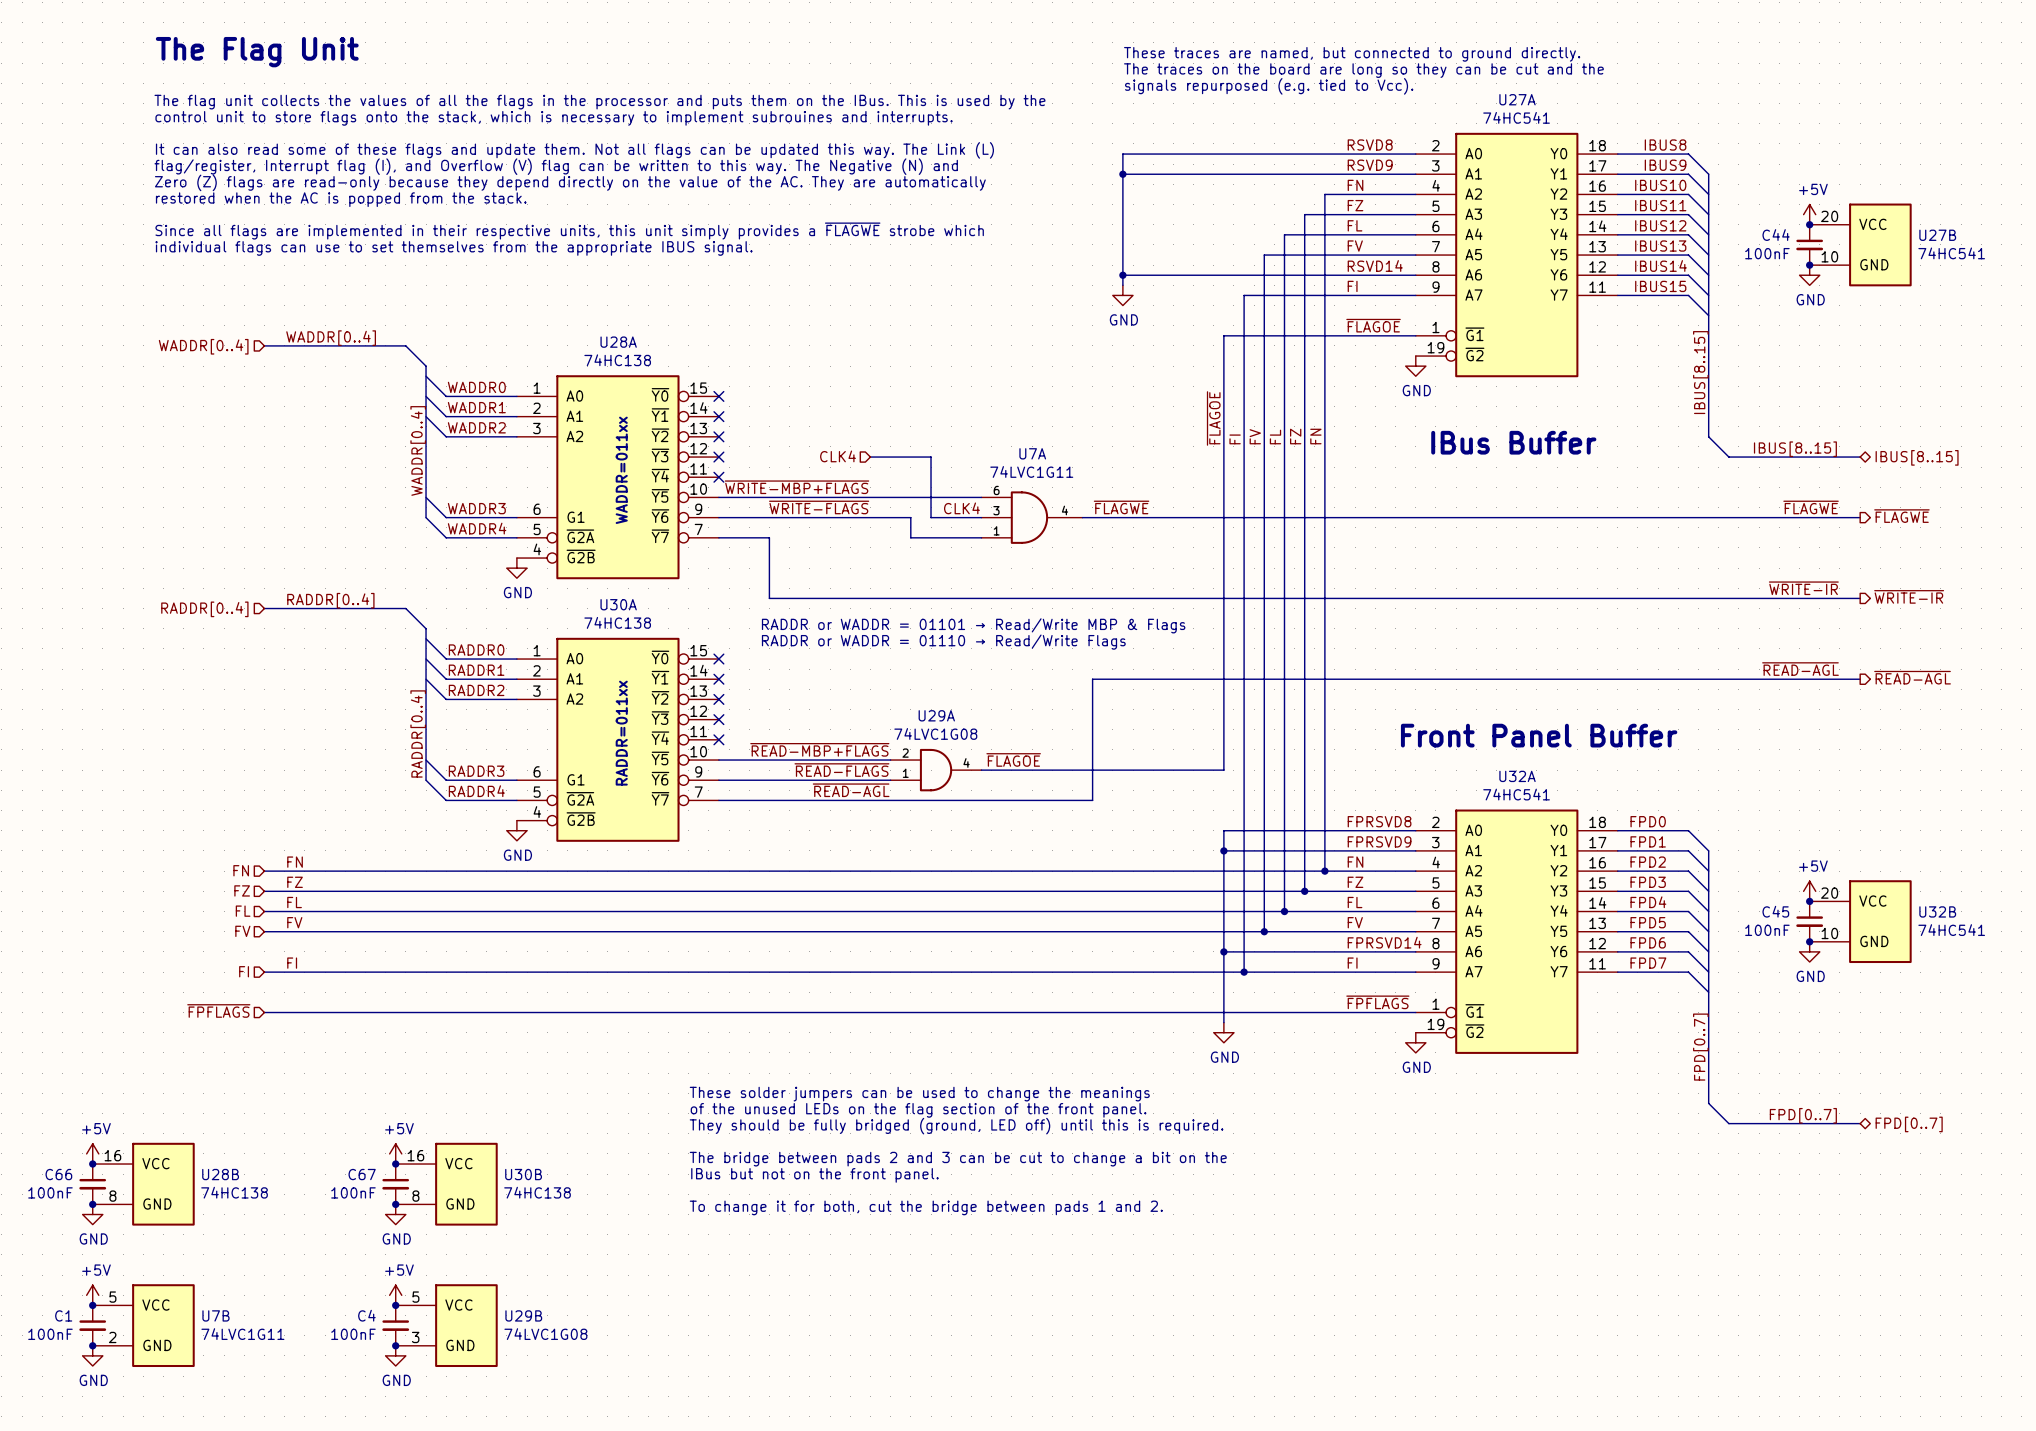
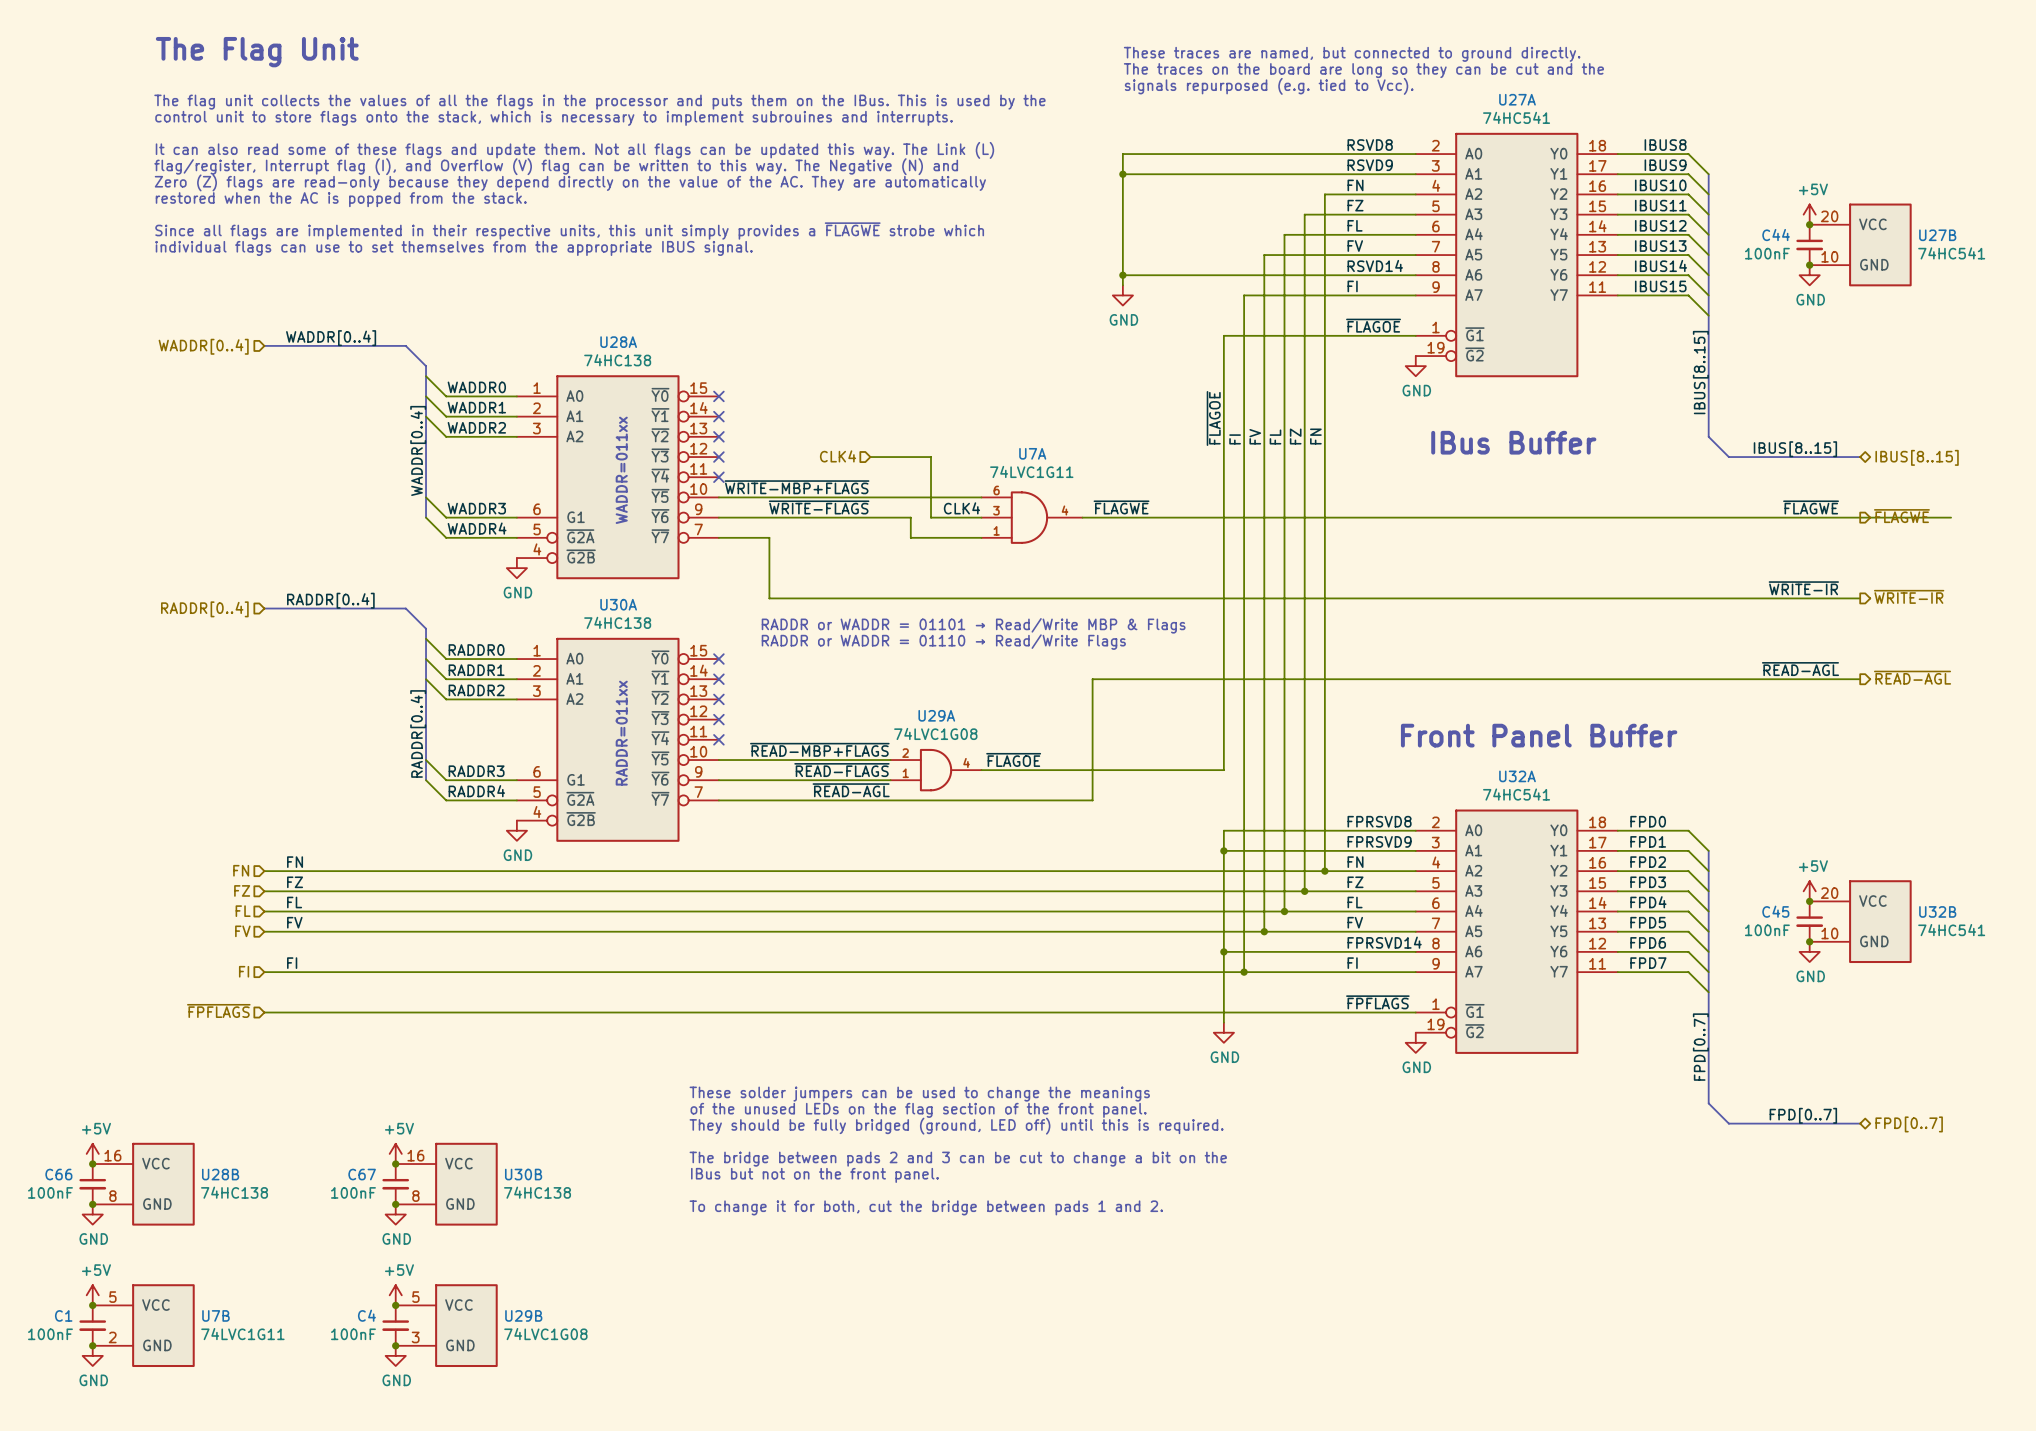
wire: none -> (1860, 517) (1951, 517)

